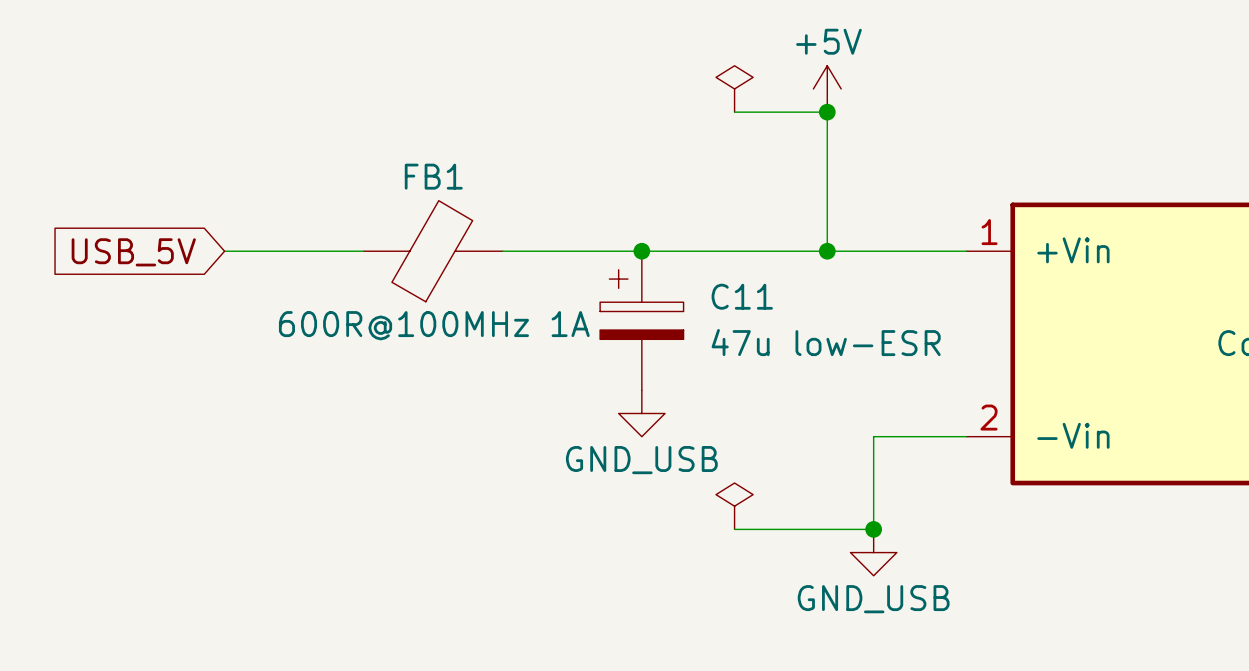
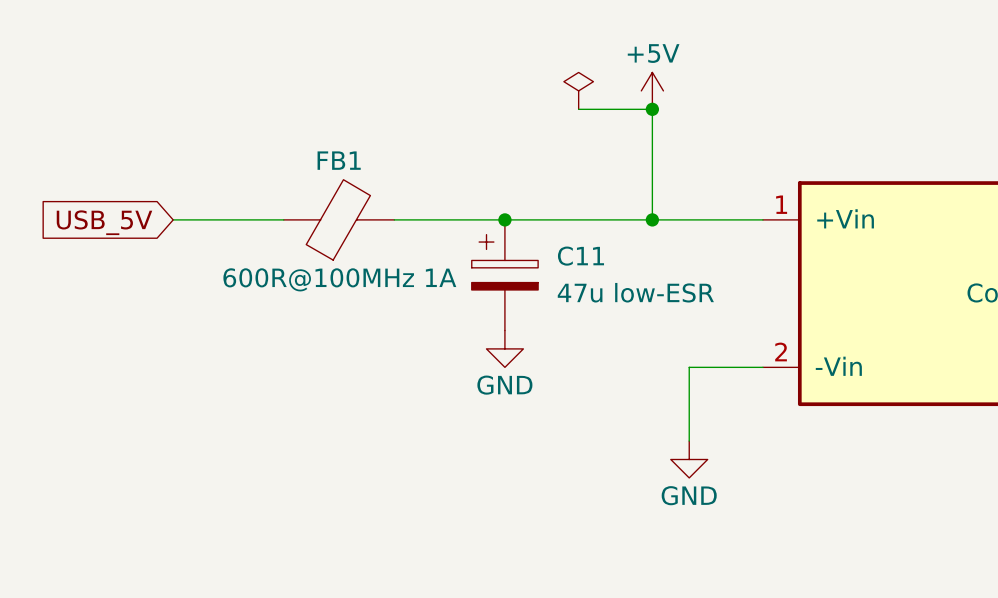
power symbol: GND_USB (641, 413) -> GND (504, 348)
power symbol: (734, 506) -> none
wire: (734, 529) (873, 529) -> none
junction: (873, 529) -> none
power symbol: GND_USB (873, 552) -> GND (689, 459)

